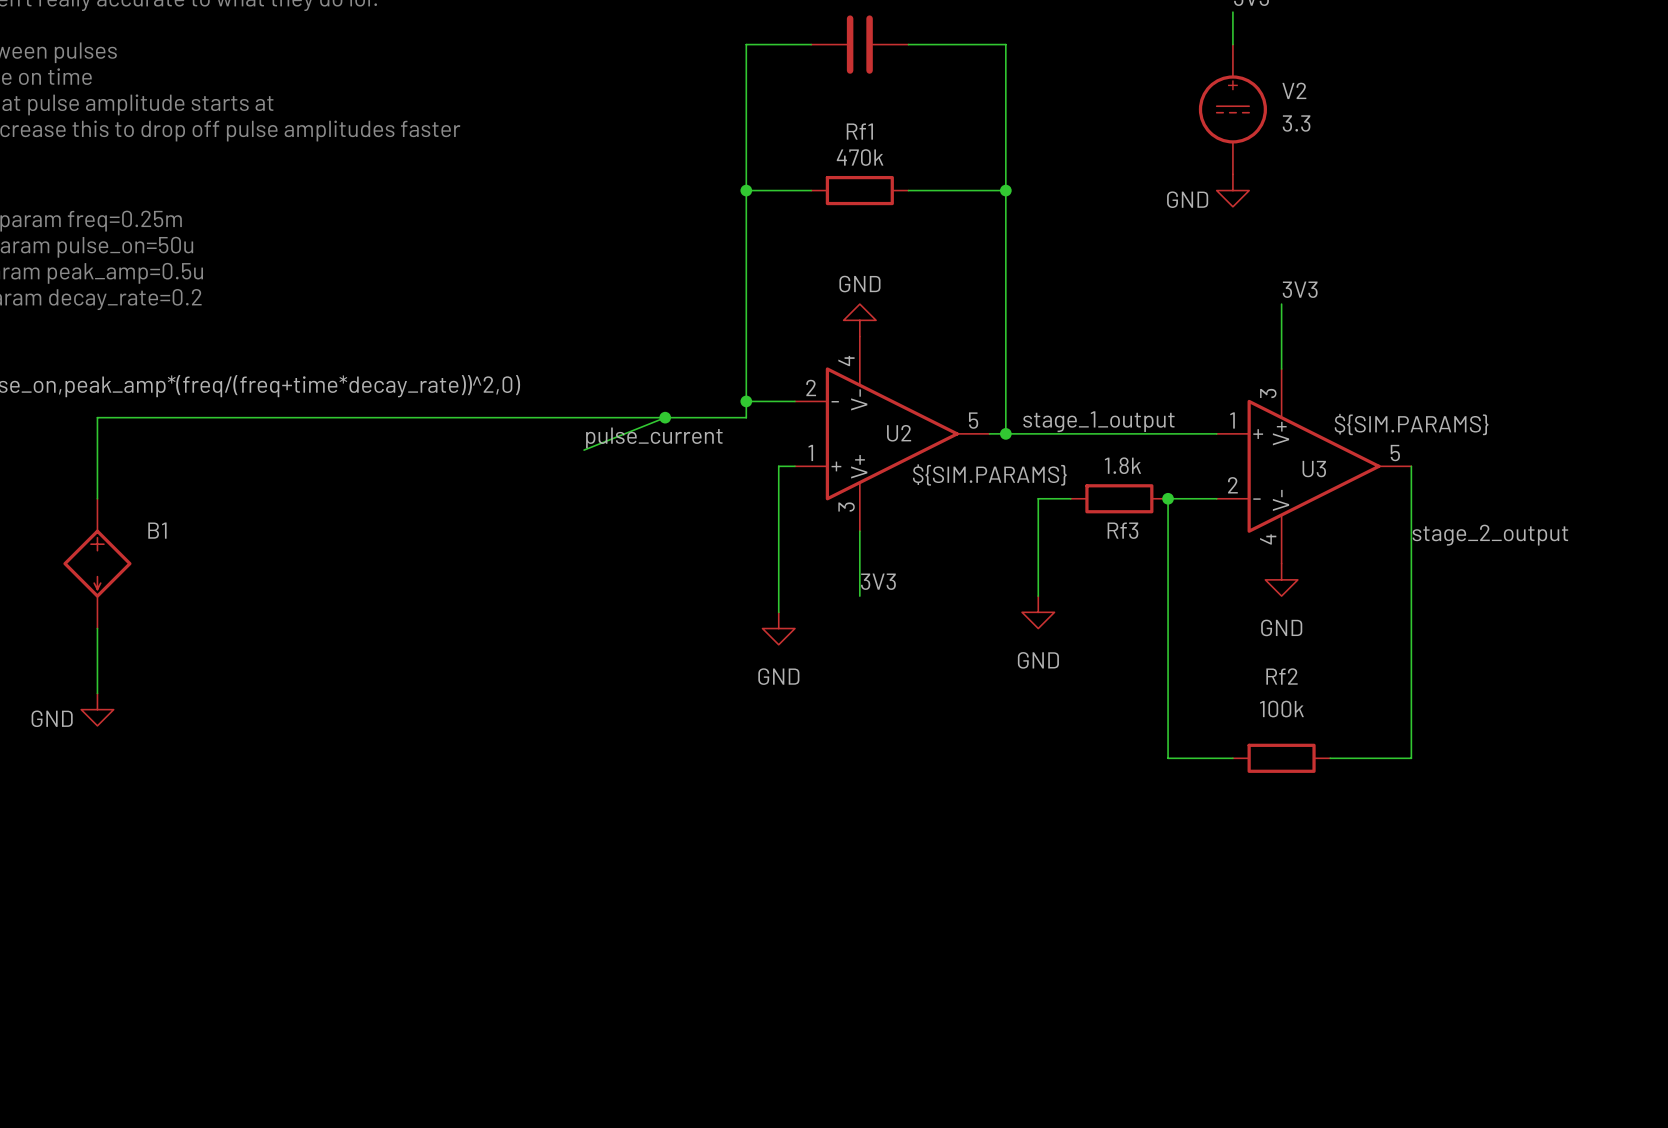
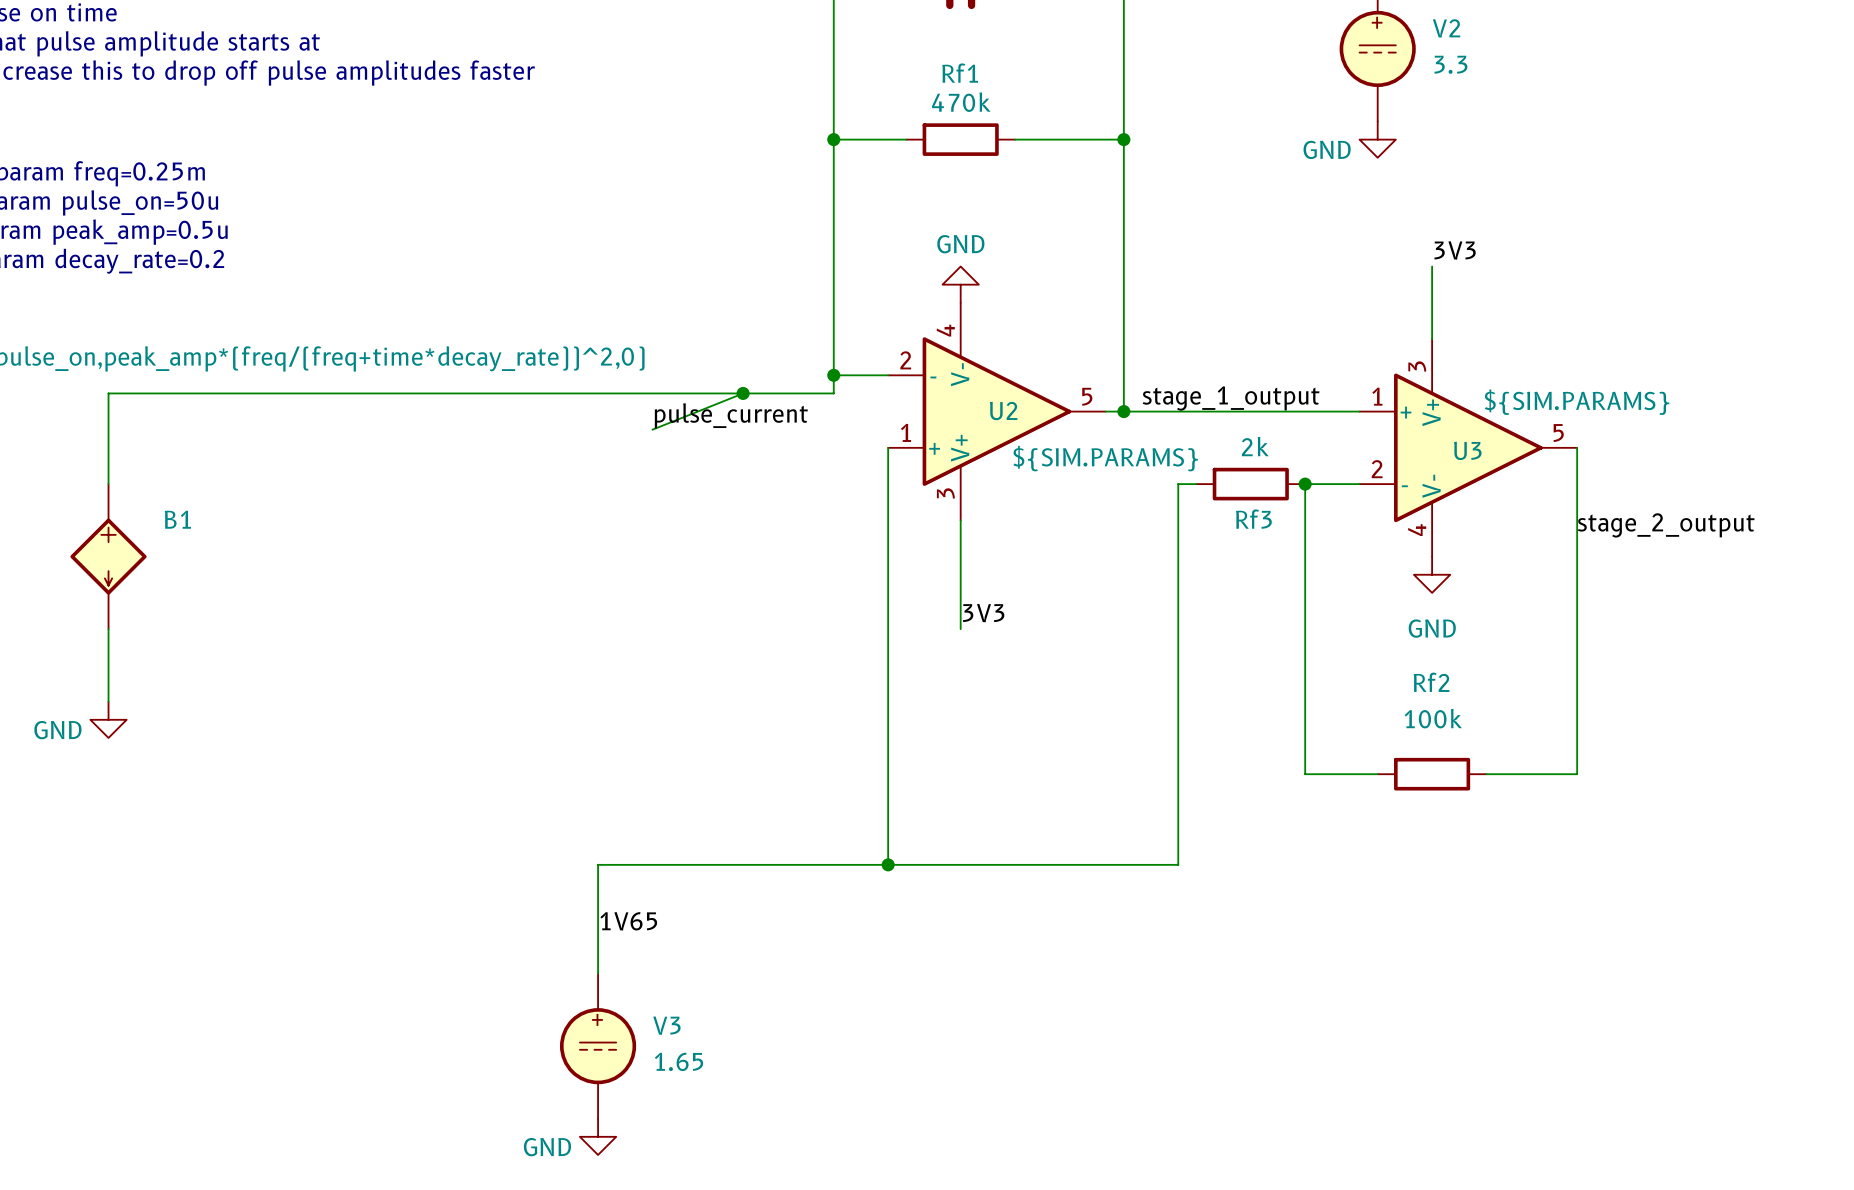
Rf3 value: 1.8k (1122, 465) -> 2k (1255, 446)
wire: (794, 466) (778, 466) (778, 612) -> (888, 447) (888, 864)
wire: (1054, 498) (1038, 498) (1038, 596) -> (1178, 484) (1178, 864) (598, 864) (598, 973)
label position: 3V3 (878, 581) -> 3V3 (983, 613)
wire: none -> (960, 592) (960, 629)
power symbol: GND (1038, 612) -> none
power symbol: GND (778, 628) -> none
junction: none -> (888, 864)
label: none -> 1V65 (628, 921)
V3: none -> 1.65 (598, 1046)
power symbol: none -> GND (598, 1136)

